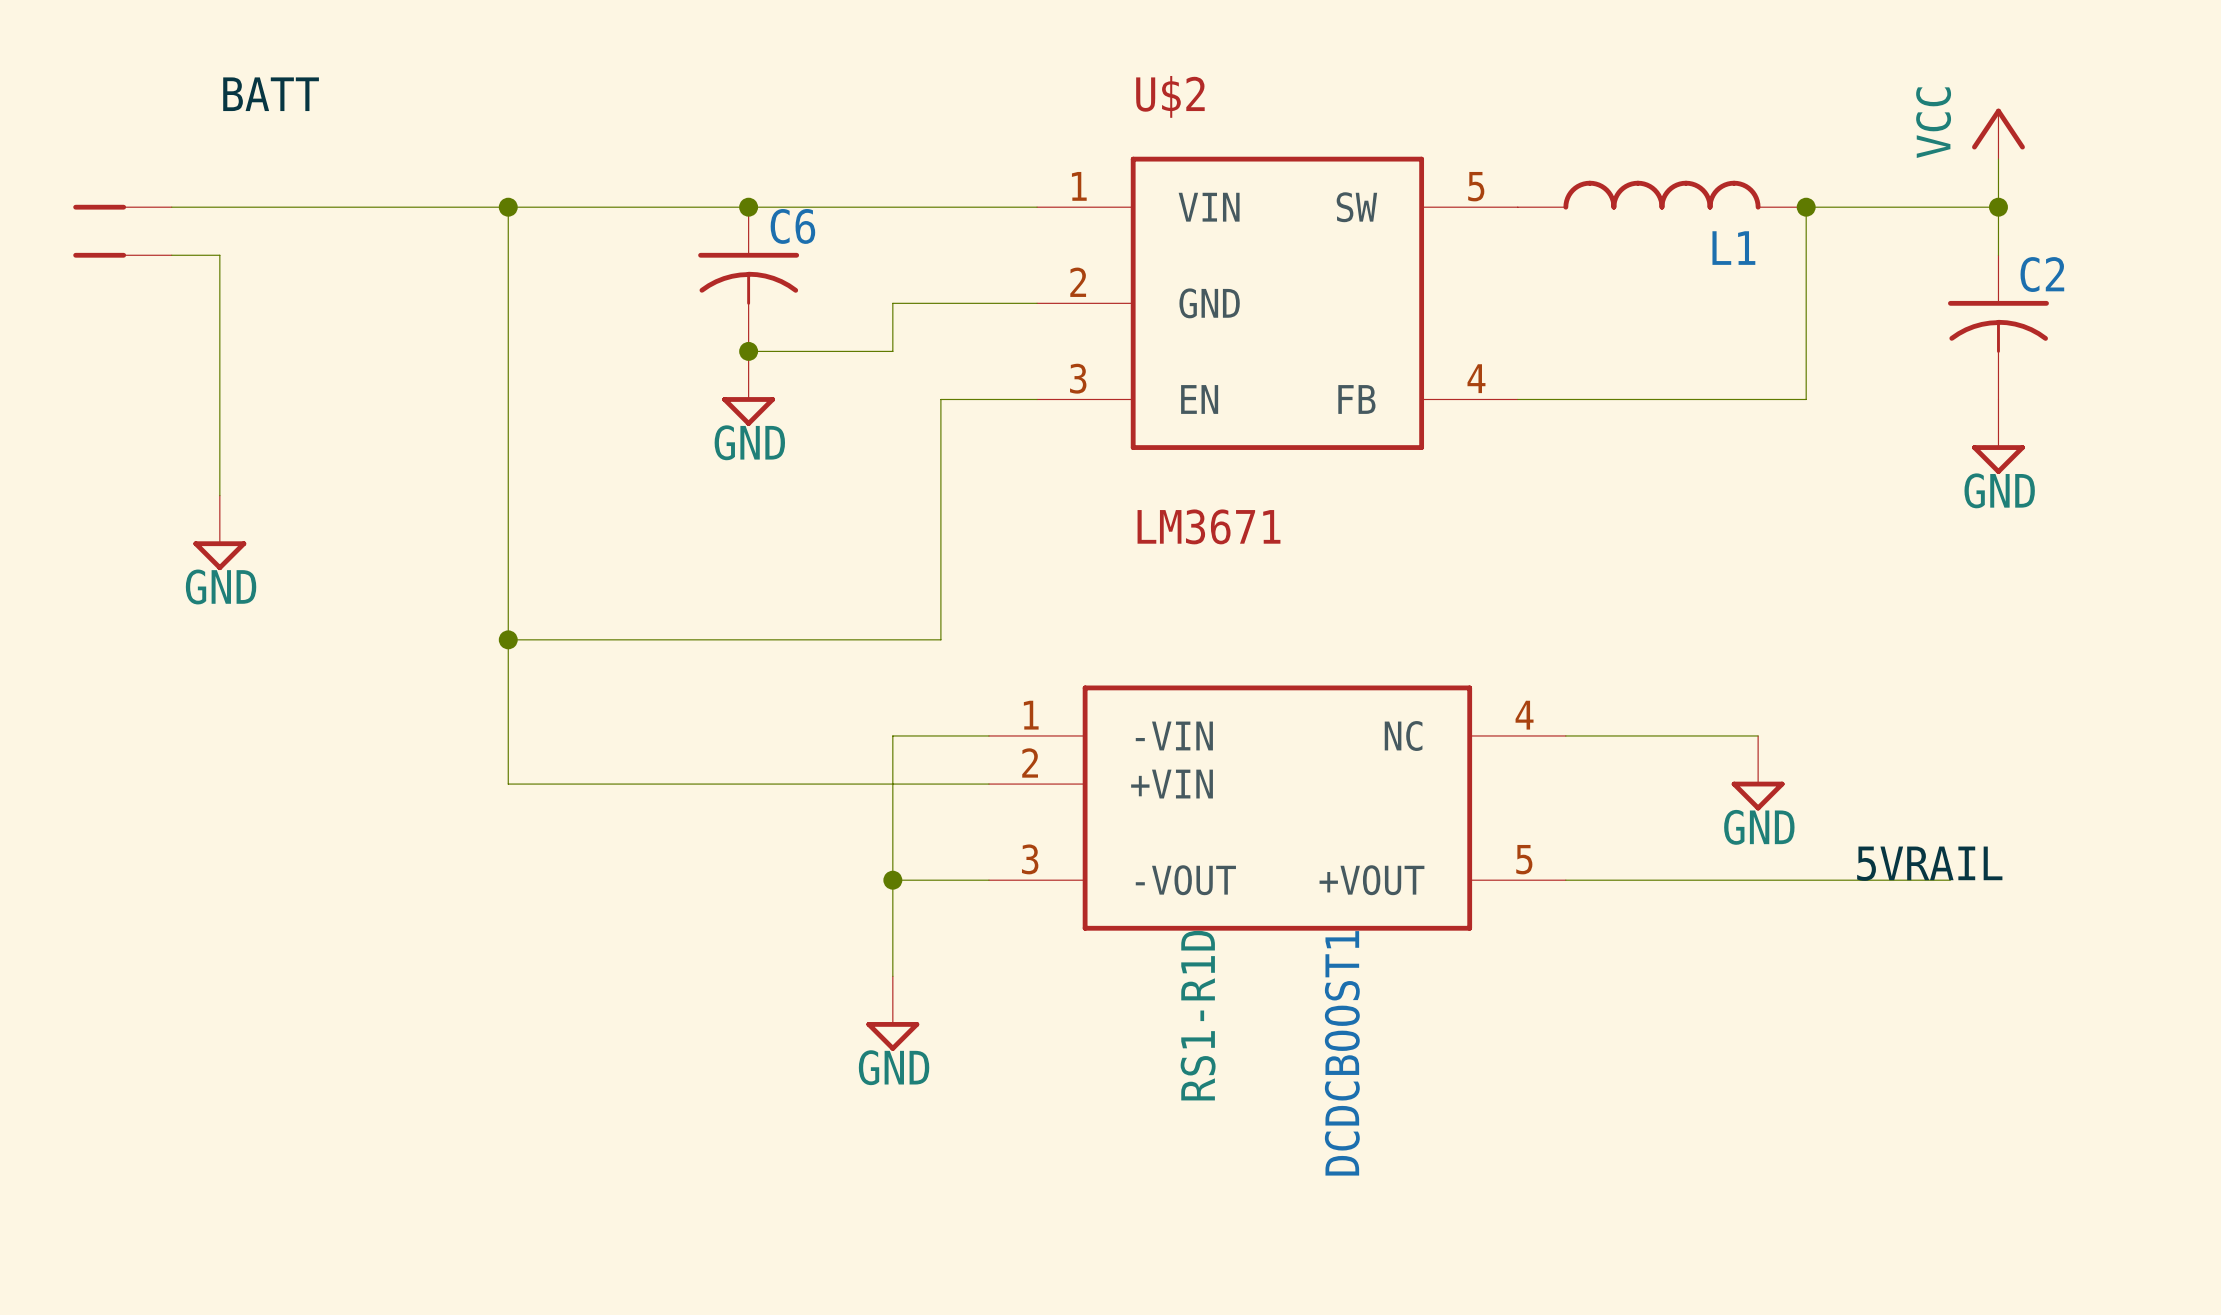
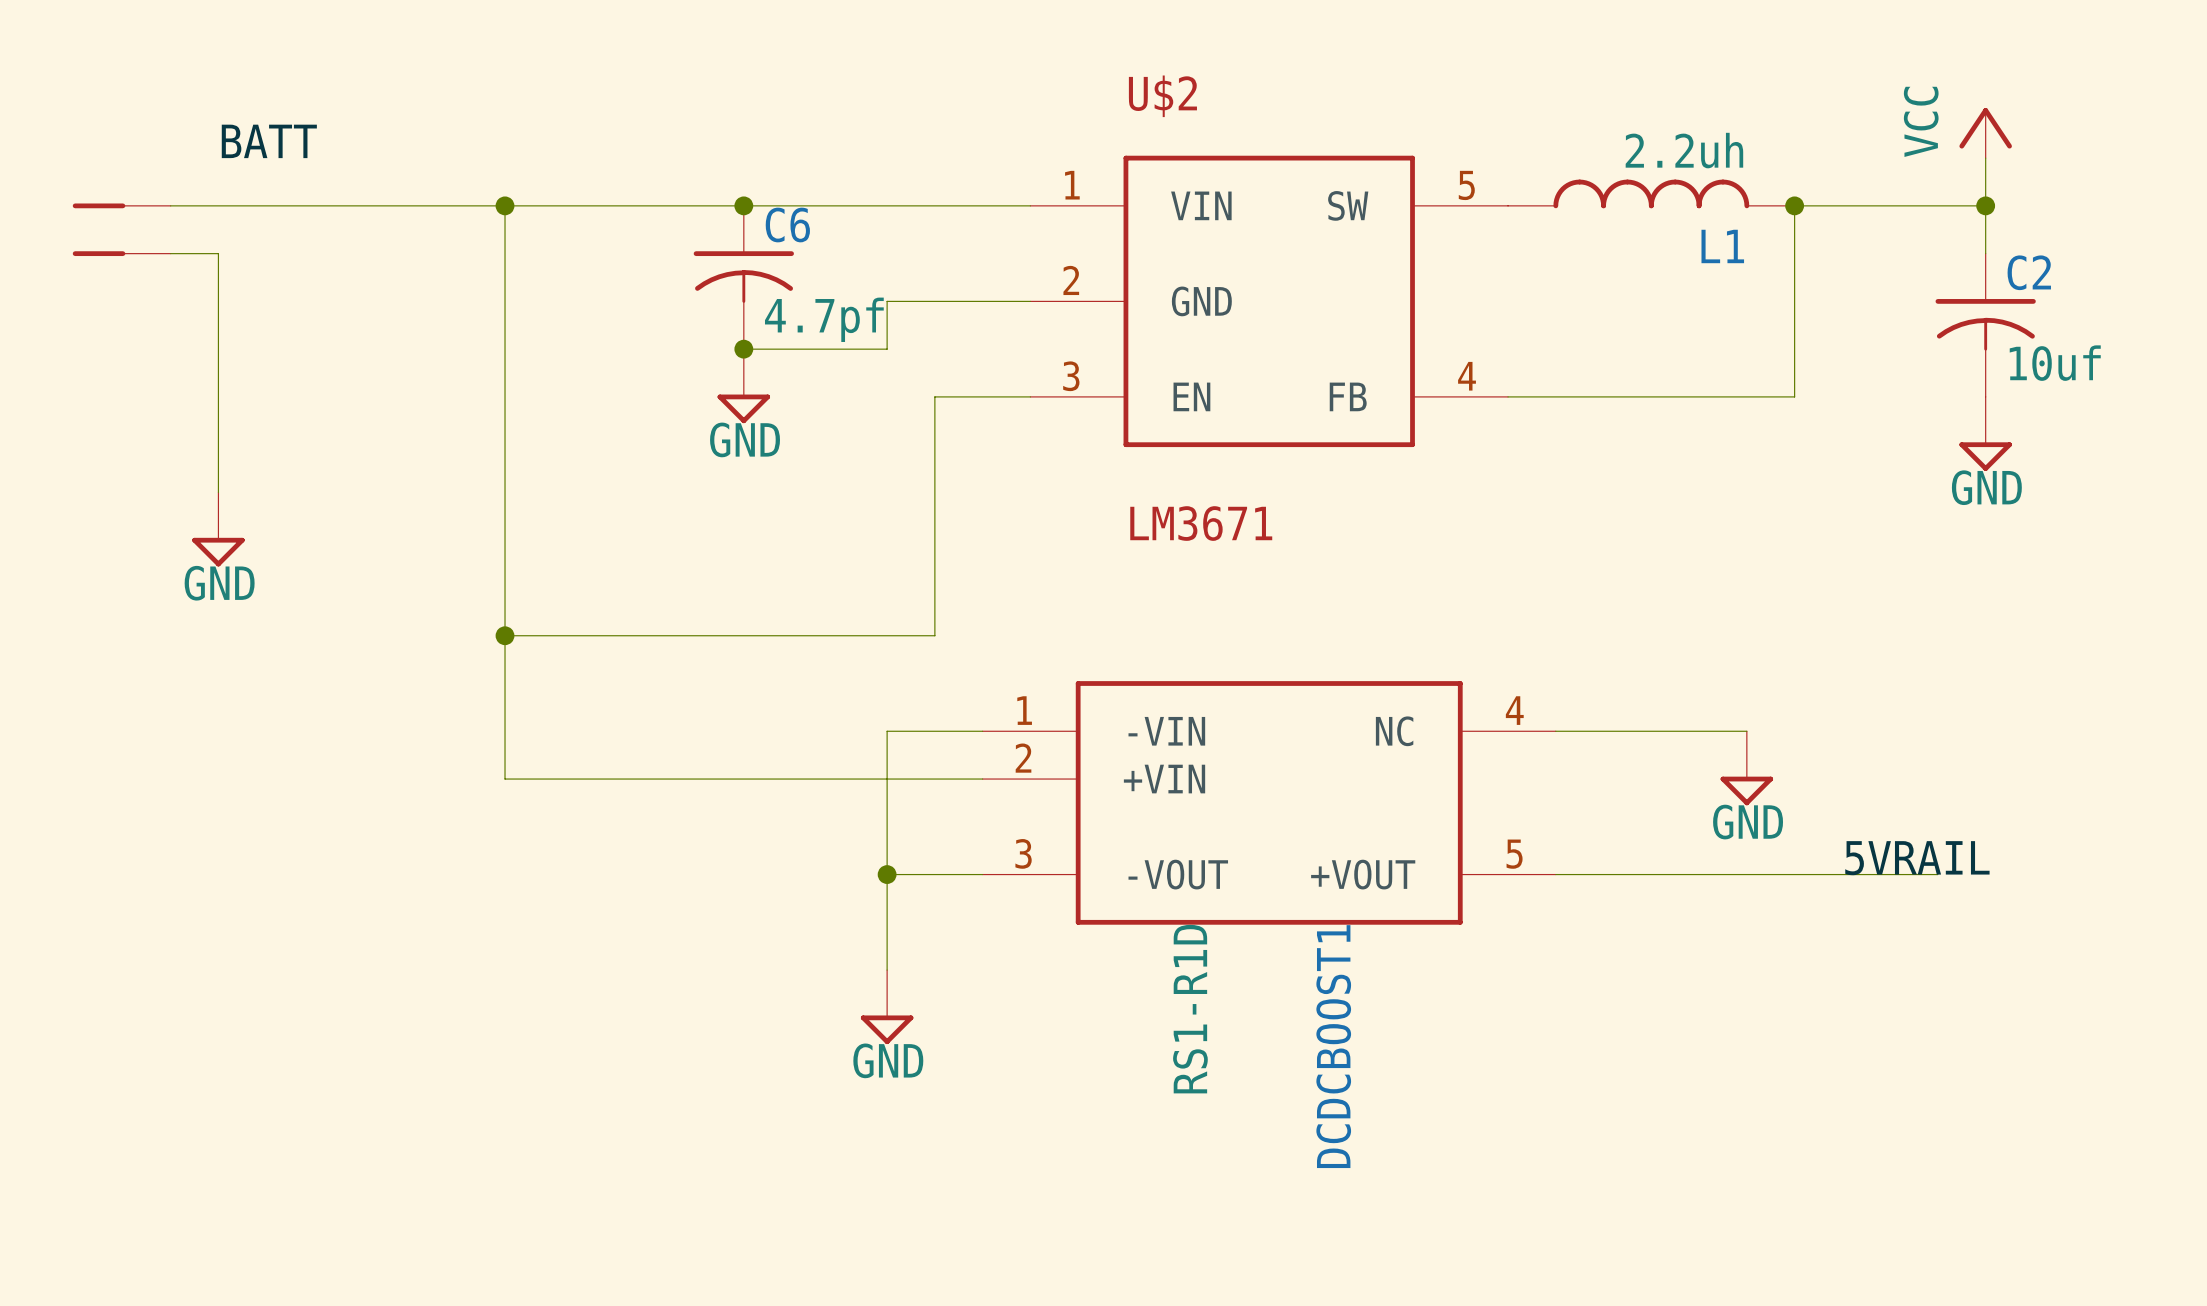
label position: BATT (271, 94) -> BATT (269, 141)
L1 value: none -> 2.2uh (1684, 150)
C6 value: none -> 4.7pf (824, 319)
C2 value: none -> 10uf (2055, 363)

